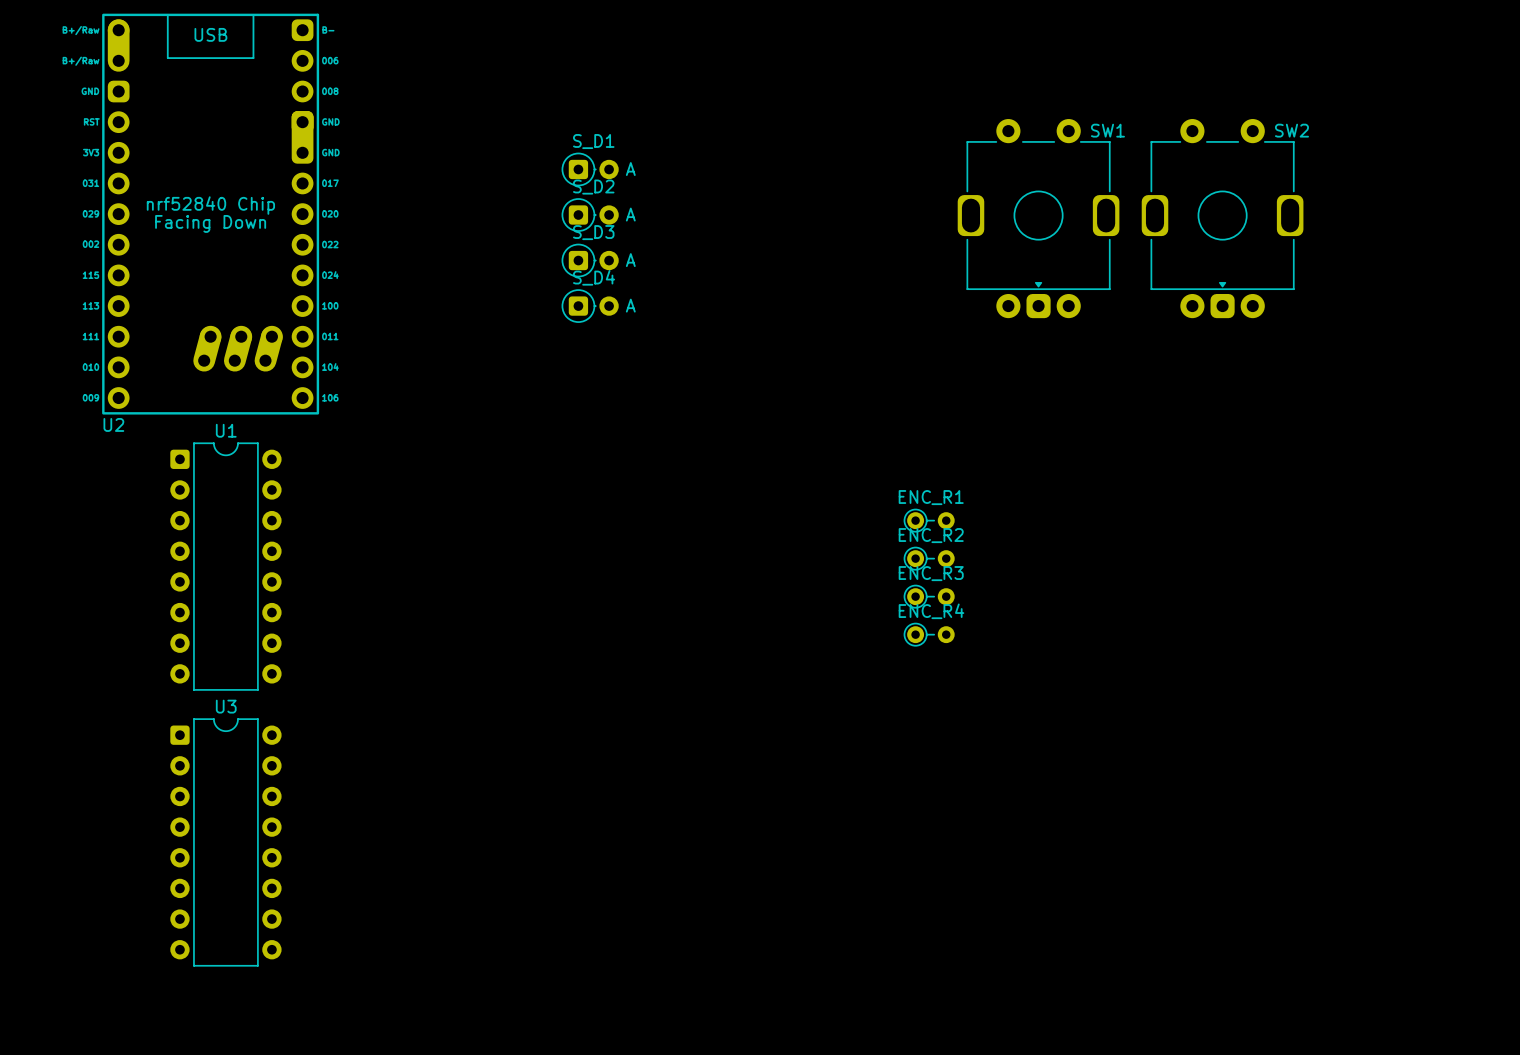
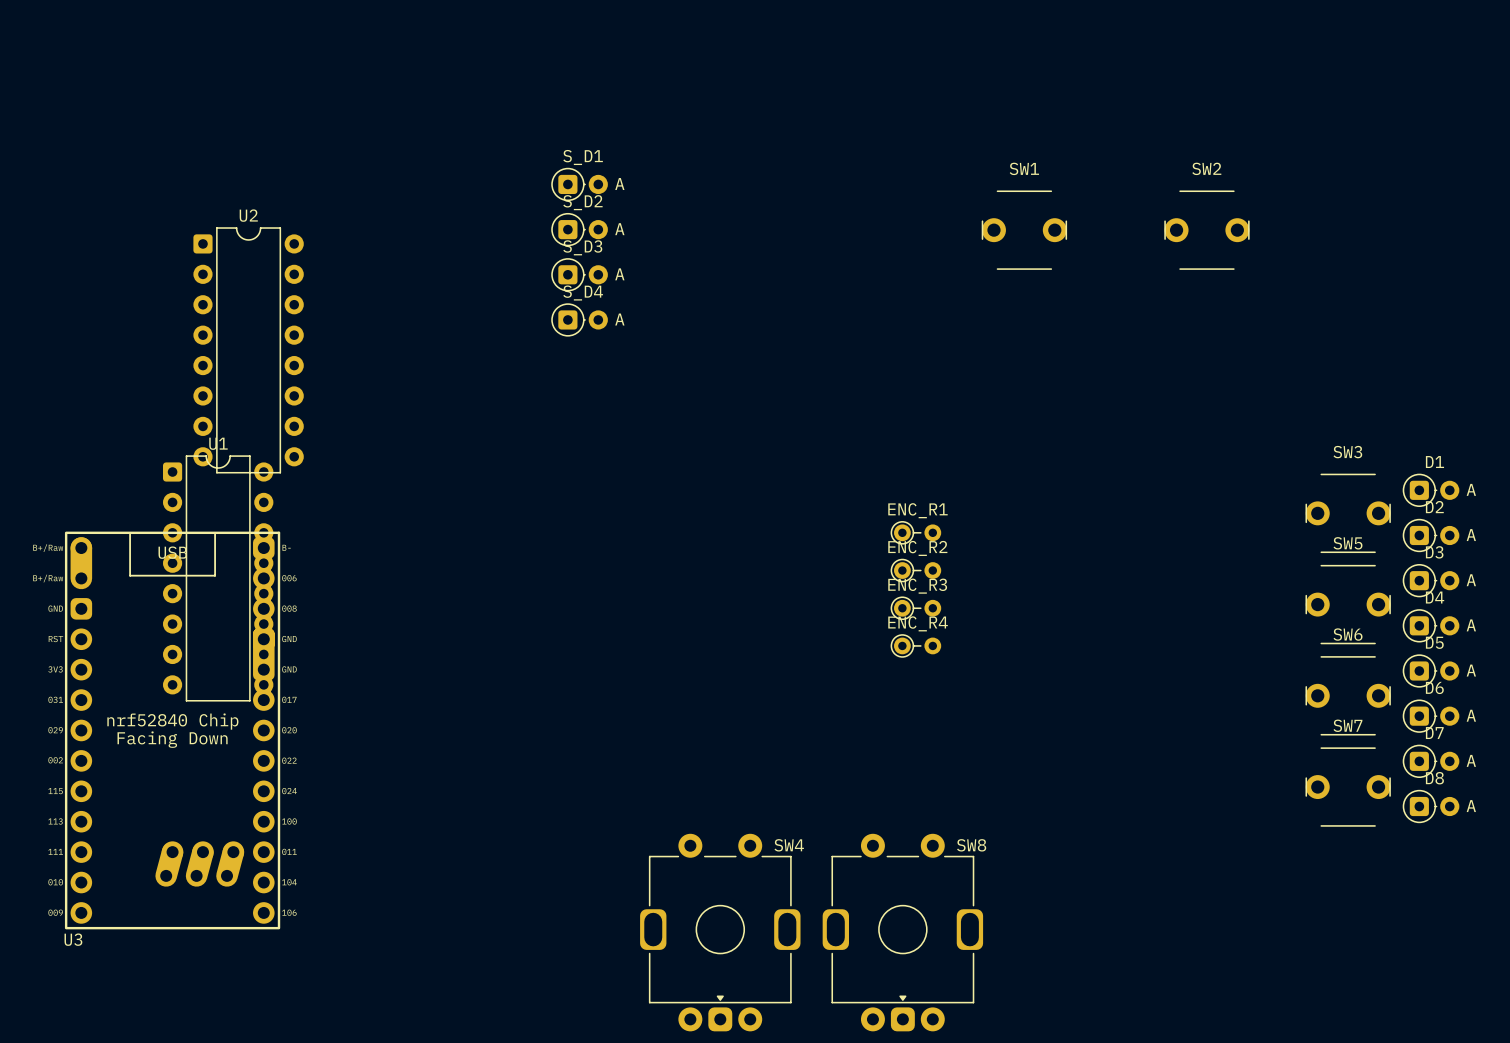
U2 footprint: [102, 13, 320, 415] -> [193, 227, 304, 474]
SW1 footprint: [957, 119, 1120, 319] -> [981, 190, 1068, 270]
SW2 footprint: [1141, 119, 1304, 319] -> [1164, 190, 1250, 270]
SW1 name position: SW1 (1107, 130) -> SW1 (1024, 168)
SW2 name position: SW2 (1291, 130) -> SW2 (1206, 168)
U2 name position: U2 (113, 424) -> U2 (248, 215)
D1: none -> (1431, 490)
SW3: none -> (1348, 513)
D2: none -> (1431, 535)
D3: none -> (1431, 580)
SW5: none -> (1348, 604)
D4: none -> (1431, 625)
D5: none -> (1431, 671)
SW6: none -> (1348, 695)
D6: none -> (1431, 716)
U3 name position: U3 (226, 706) -> U3 (73, 939)
U3 footprint: [170, 718, 282, 967] -> [64, 531, 281, 930]
D7: none -> (1431, 761)
SW7: none -> (1348, 787)
D8: none -> (1431, 806)
SW4: none -> (720, 932)
SW8: none -> (902, 932)

